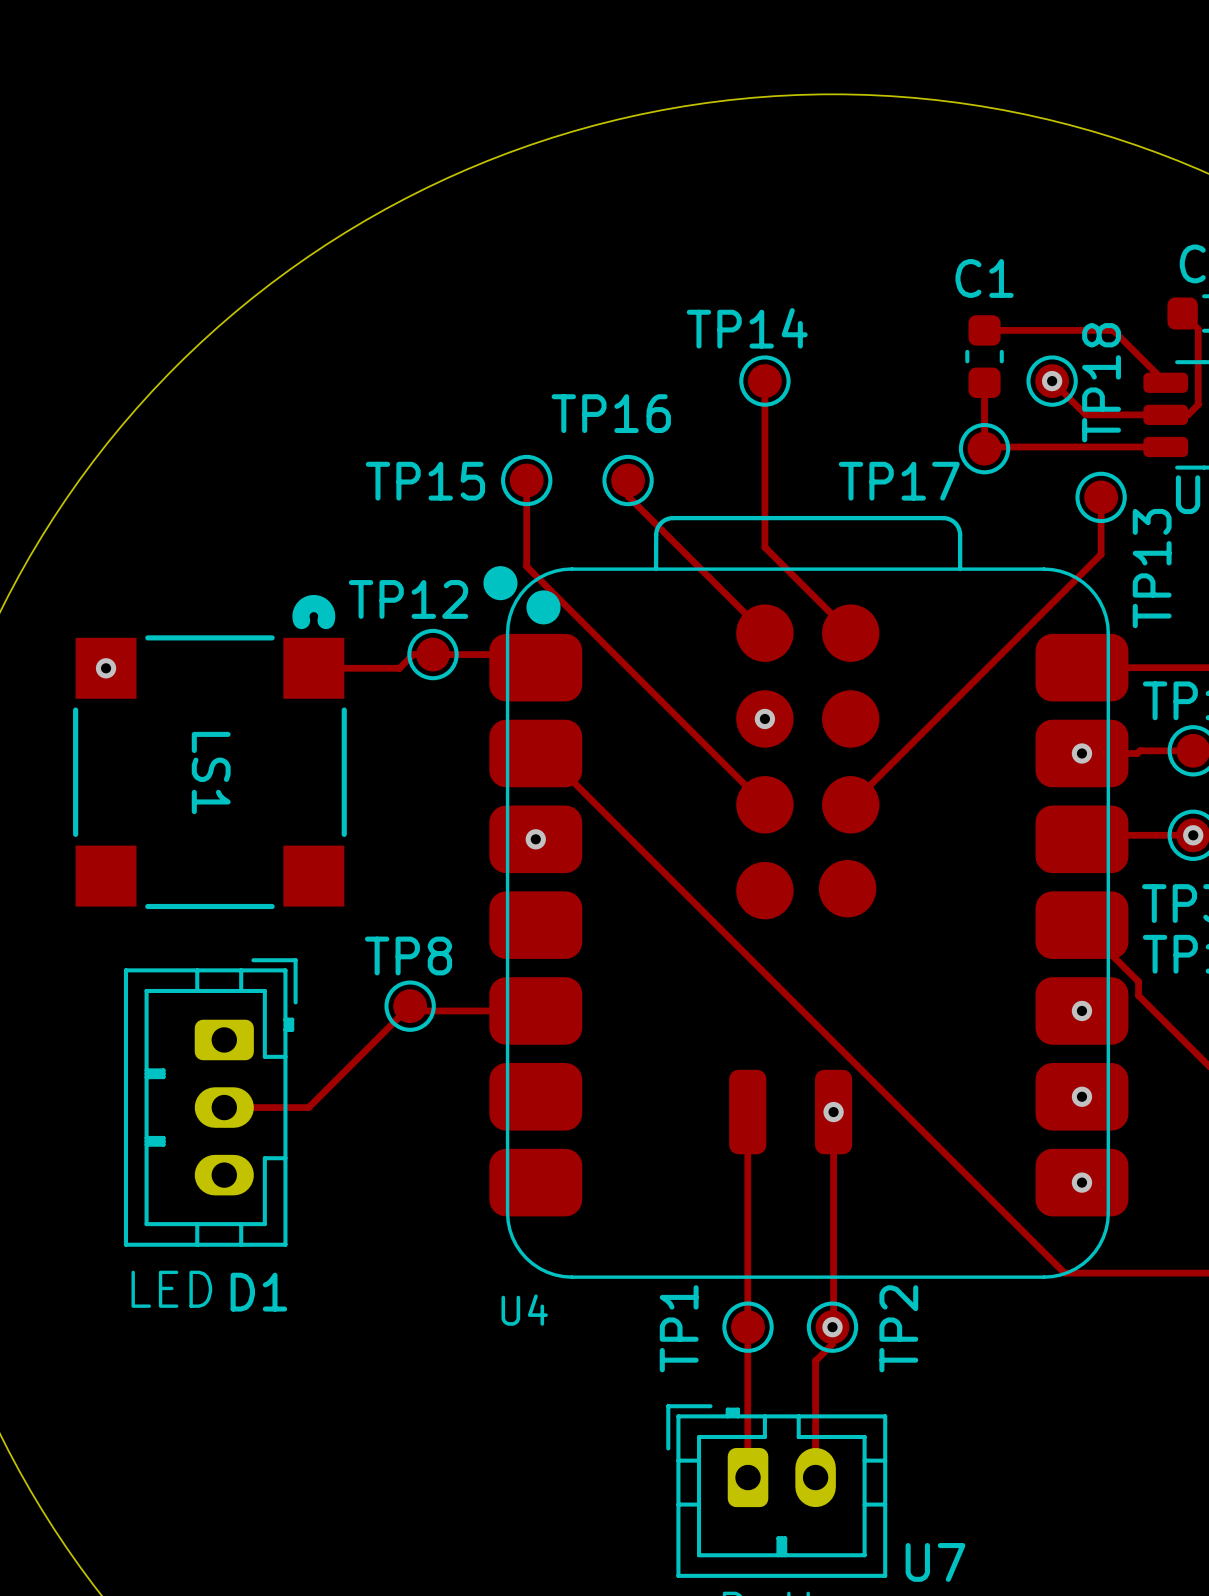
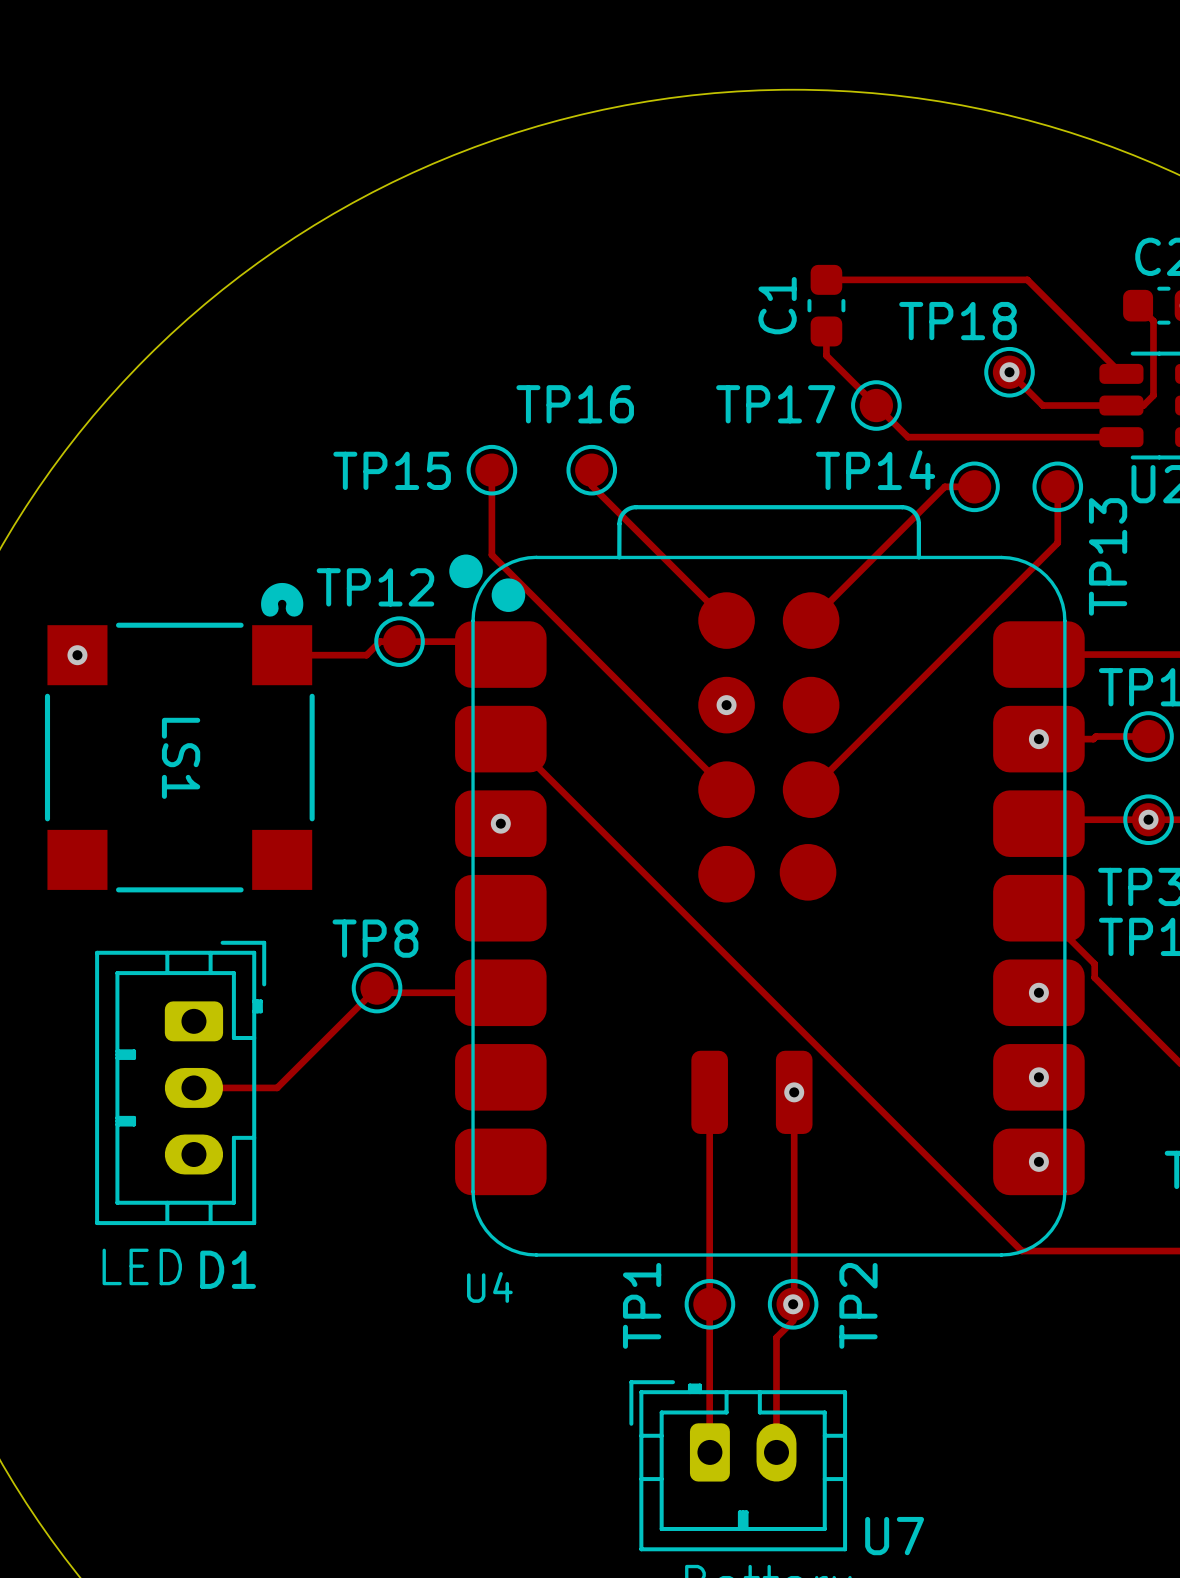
C1 name rotation: 0° (984, 278) -> 90° counterclockwise (777, 305)
C1 name position: C1 (984, 278) -> C1 (777, 305)
TP14 name position: TP14 (747, 328) -> TP14 (875, 470)
track: (984, 330) (1113, 330) -> (826, 279) (1027, 279) (1069, 322)
C1 position: (984, 356) -> (826, 305)
track: (764, 381) (764, 547) (850, 633) -> (974, 486) (944, 486) (811, 620)
TP14 position: (764, 381) -> (974, 486)
track: (984, 382) (984, 446) -> (826, 331) (826, 355) (907, 437) (942, 437)
TP18 name rotation: 0° (1101, 382) -> 90° clockwise (958, 321)
TP17 position: (984, 448) -> (876, 405)
TP17 name position: TP17 (899, 481) -> TP17 (775, 404)

